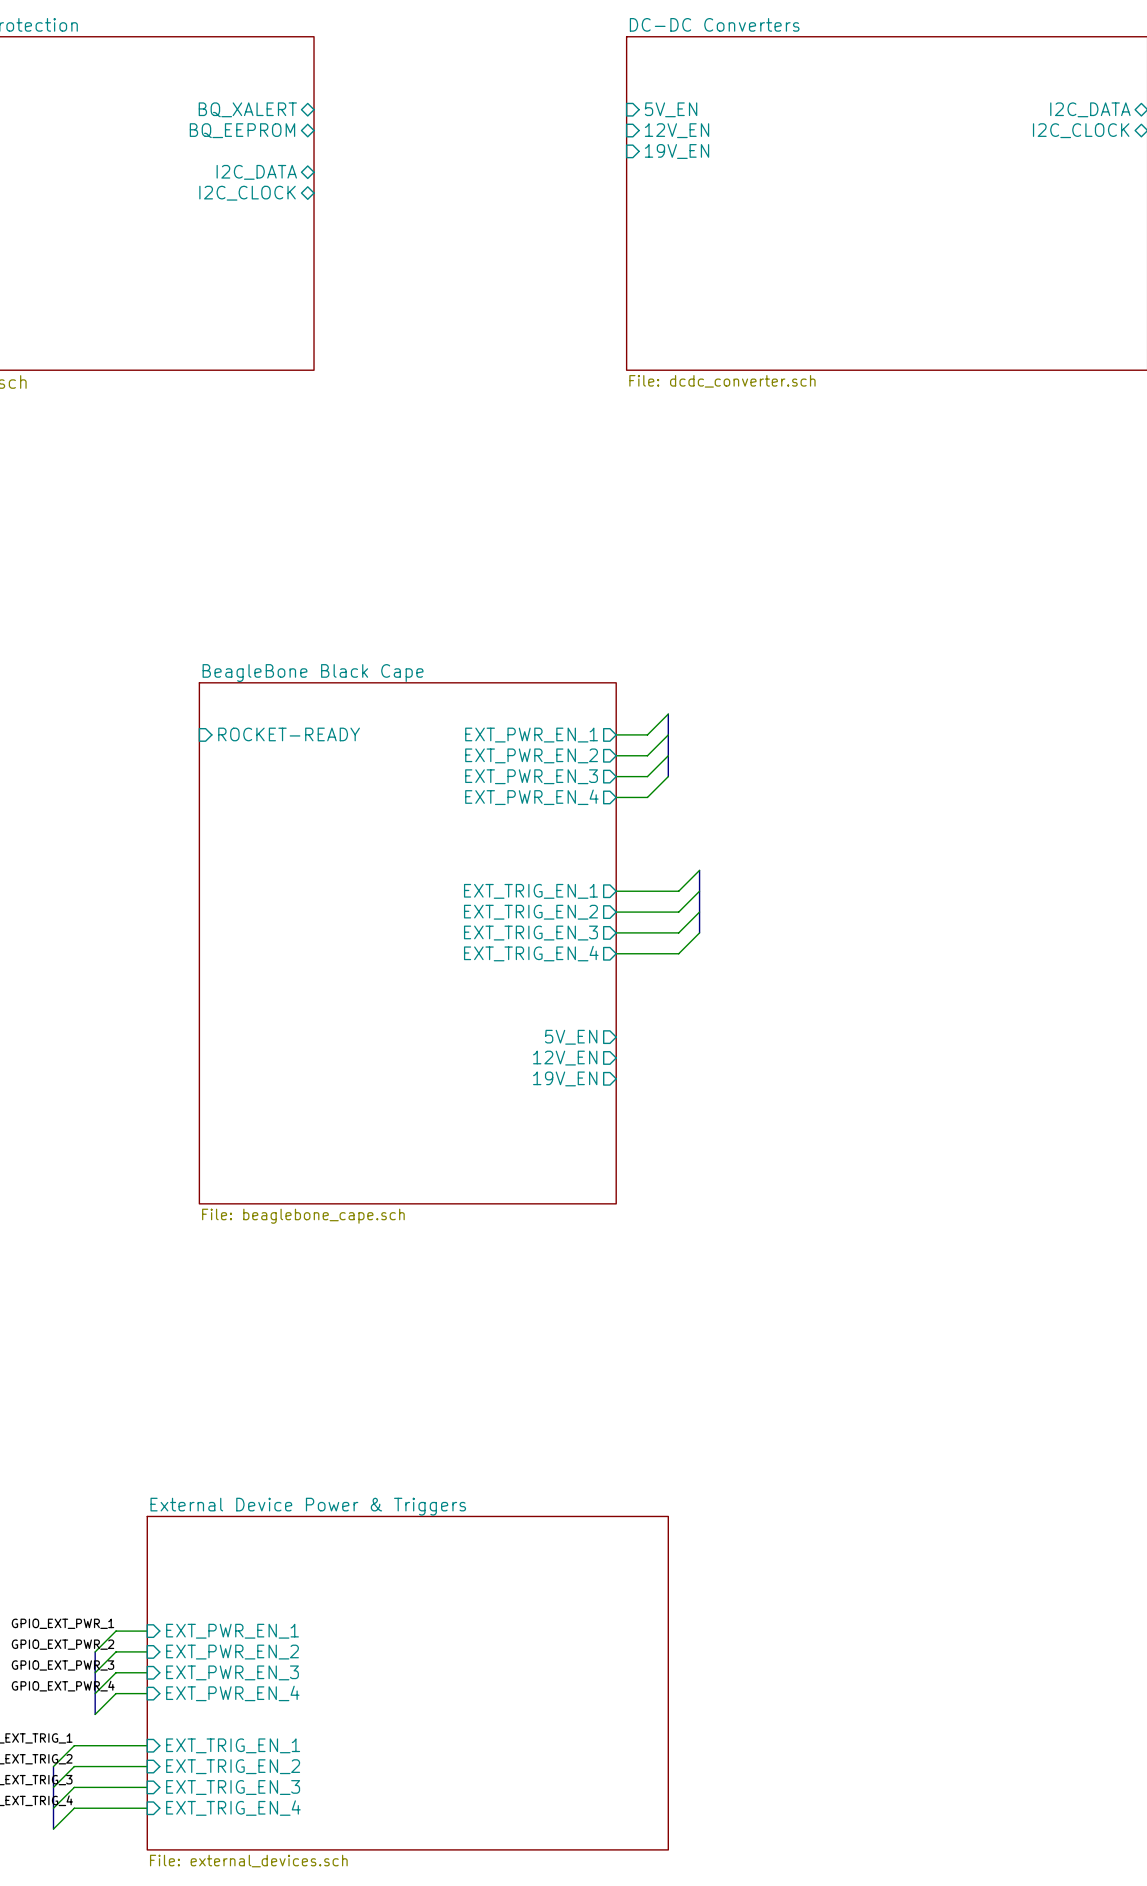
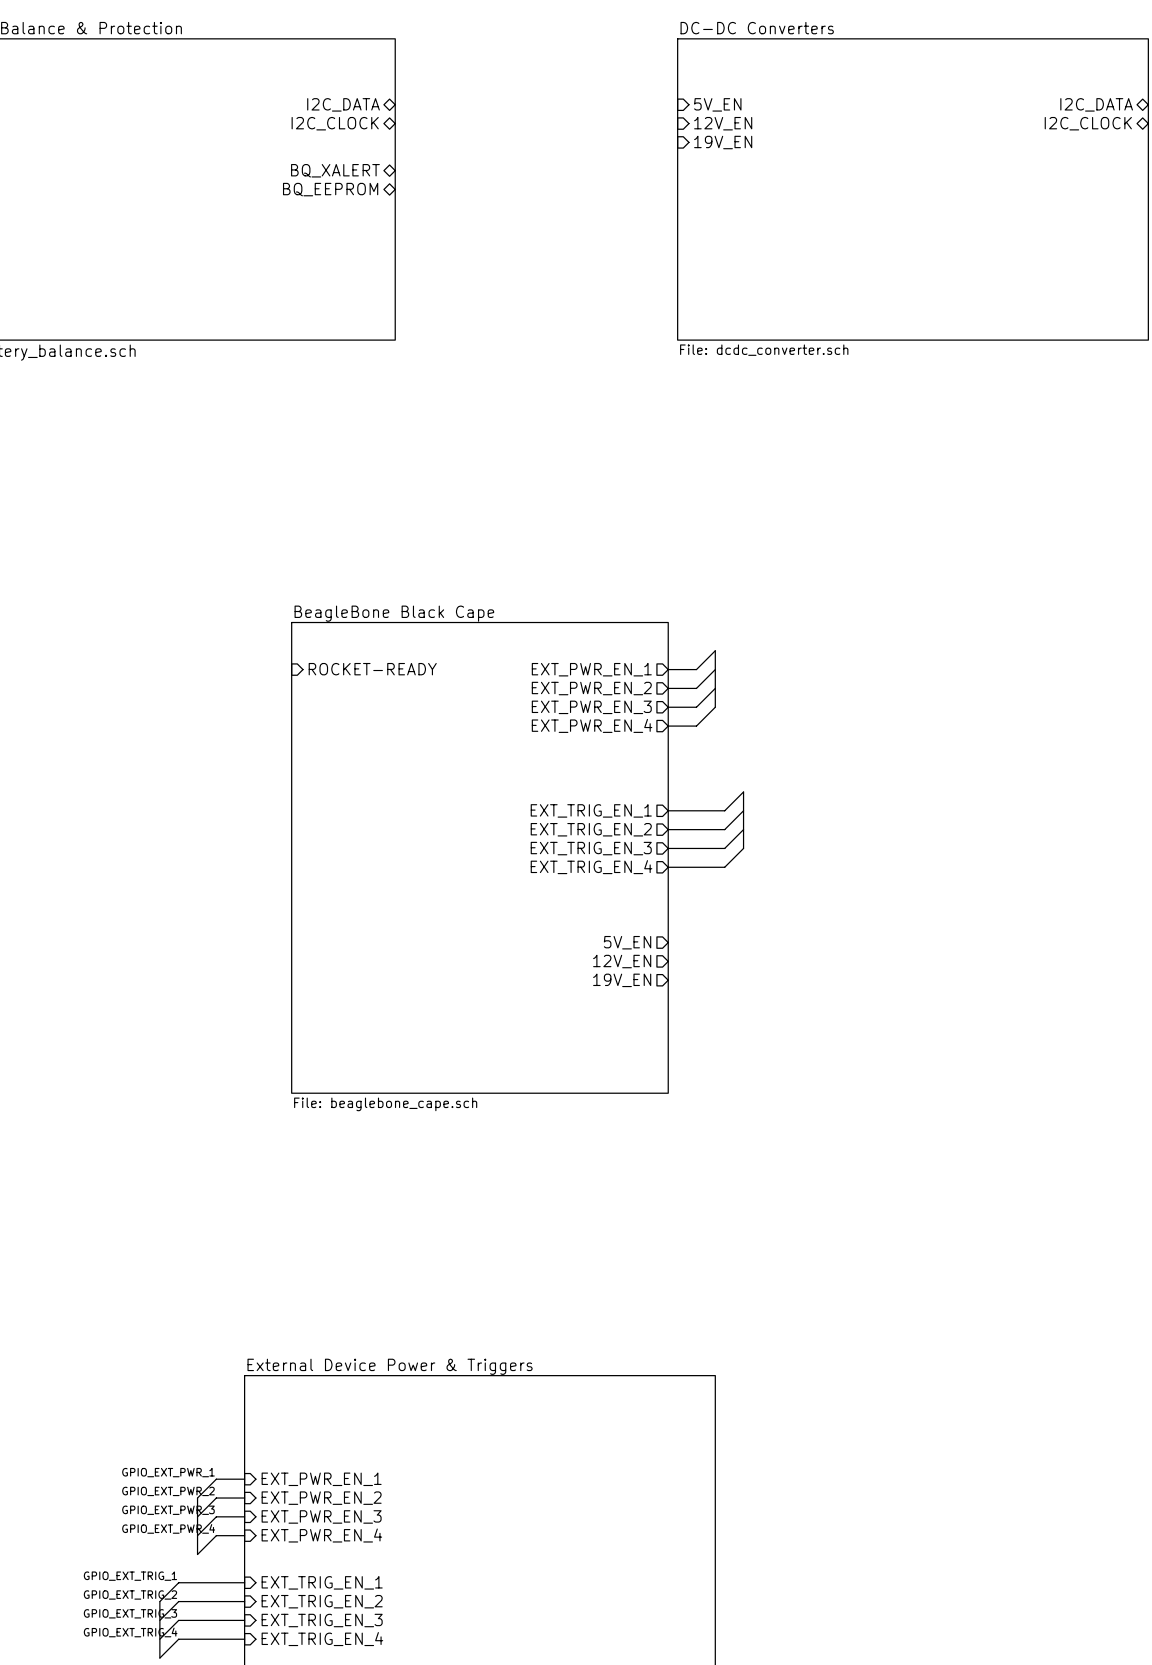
sheet pin: BQ_XALERT (247, 109) -> I2C_DATA (343, 104)
sheet pin: BQ_EEPROM (242, 130) -> I2C_CLOCK (335, 123)
sheet pin: I2C_DATA (256, 172) -> none
sheet pin: none -> BQ_XALERT (335, 170)
sheet pin: I2C_CLOCK (247, 193) -> none
sheet pin: none -> BQ_EEPROM (330, 189)

